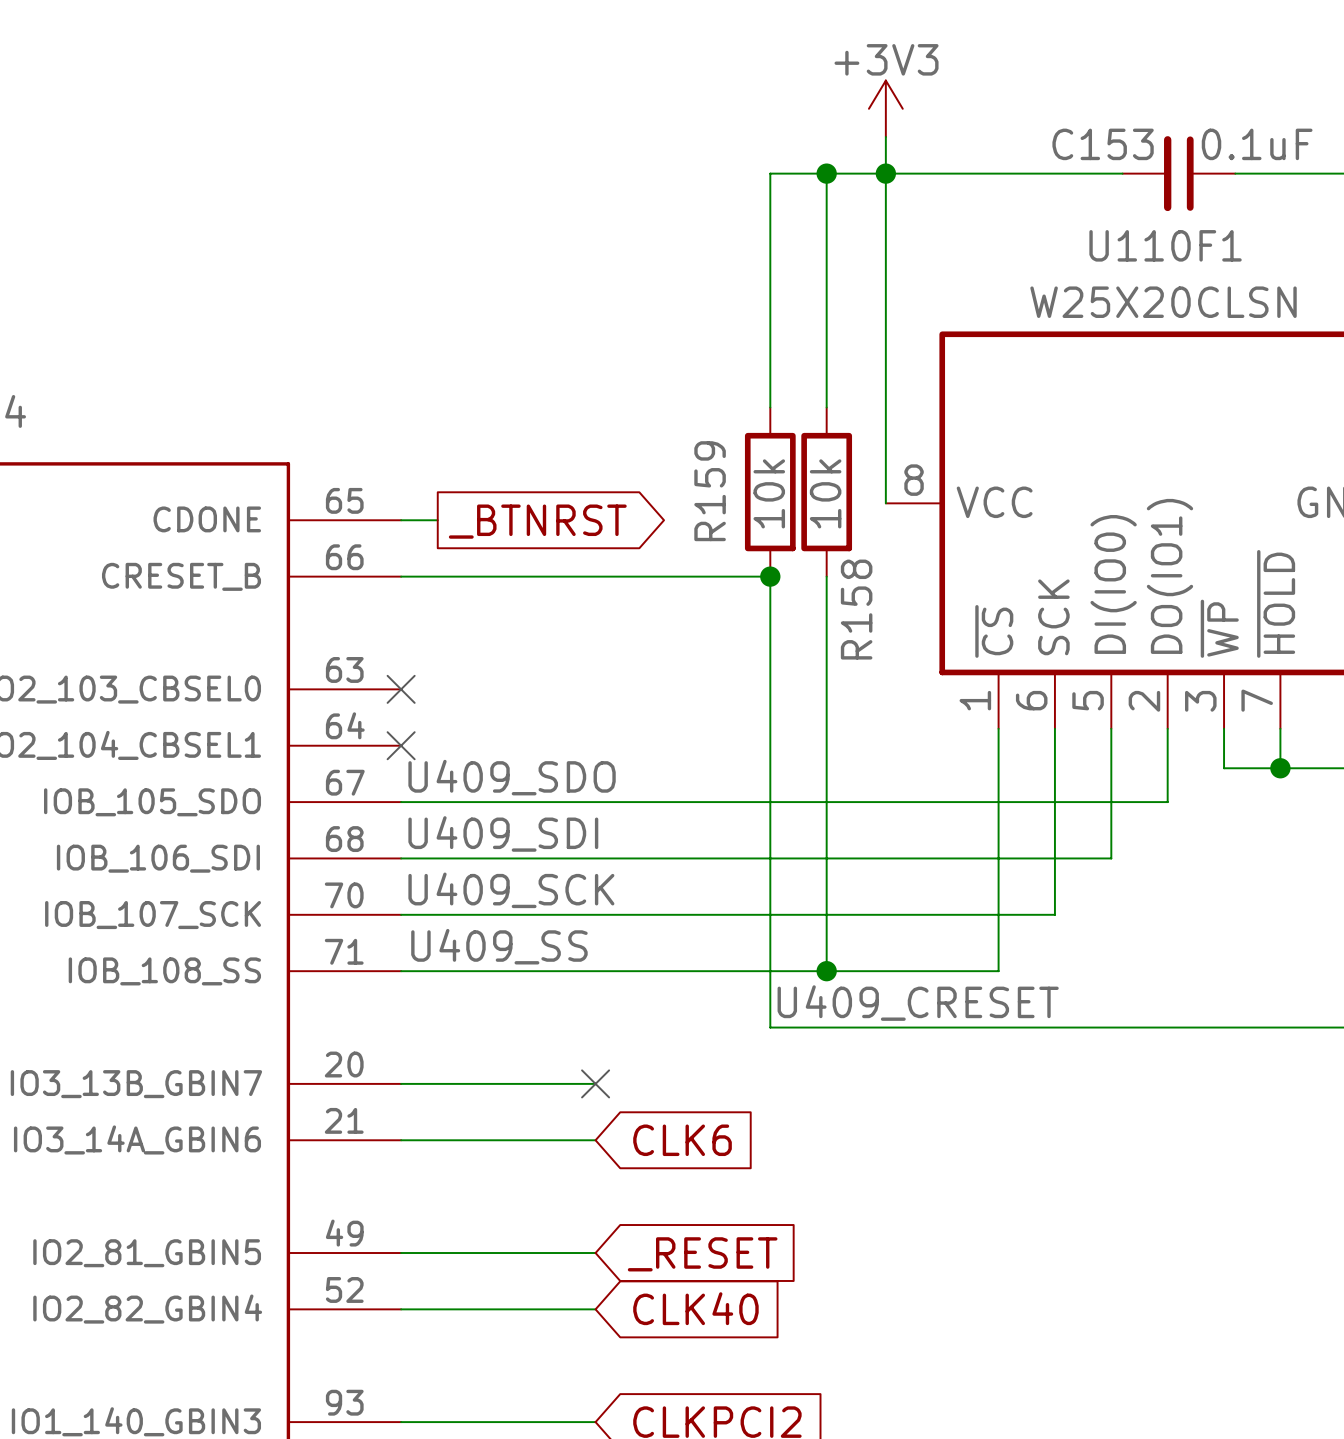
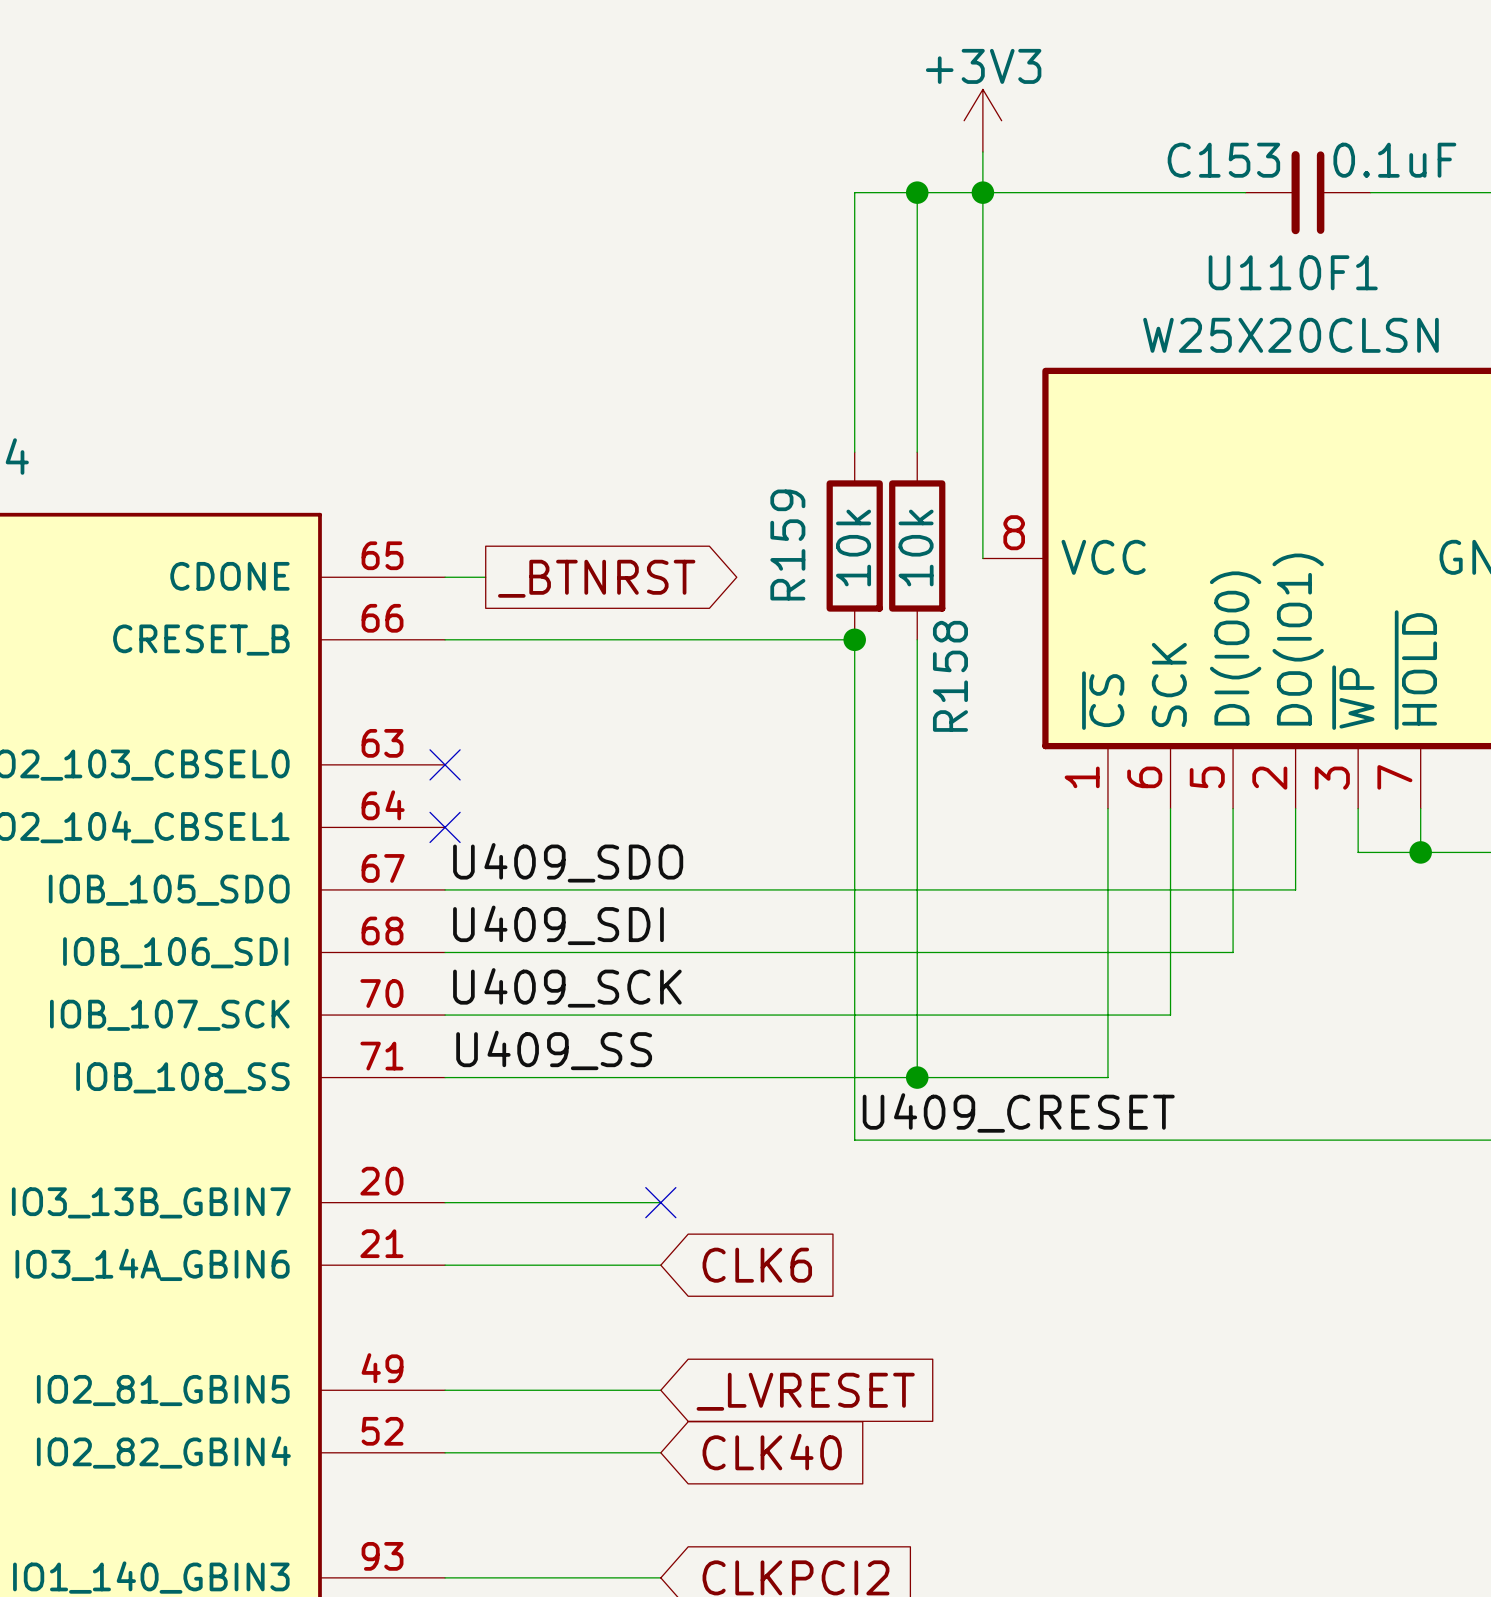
global label: _RESET (702, 1254) -> _LVRESET (805, 1391)

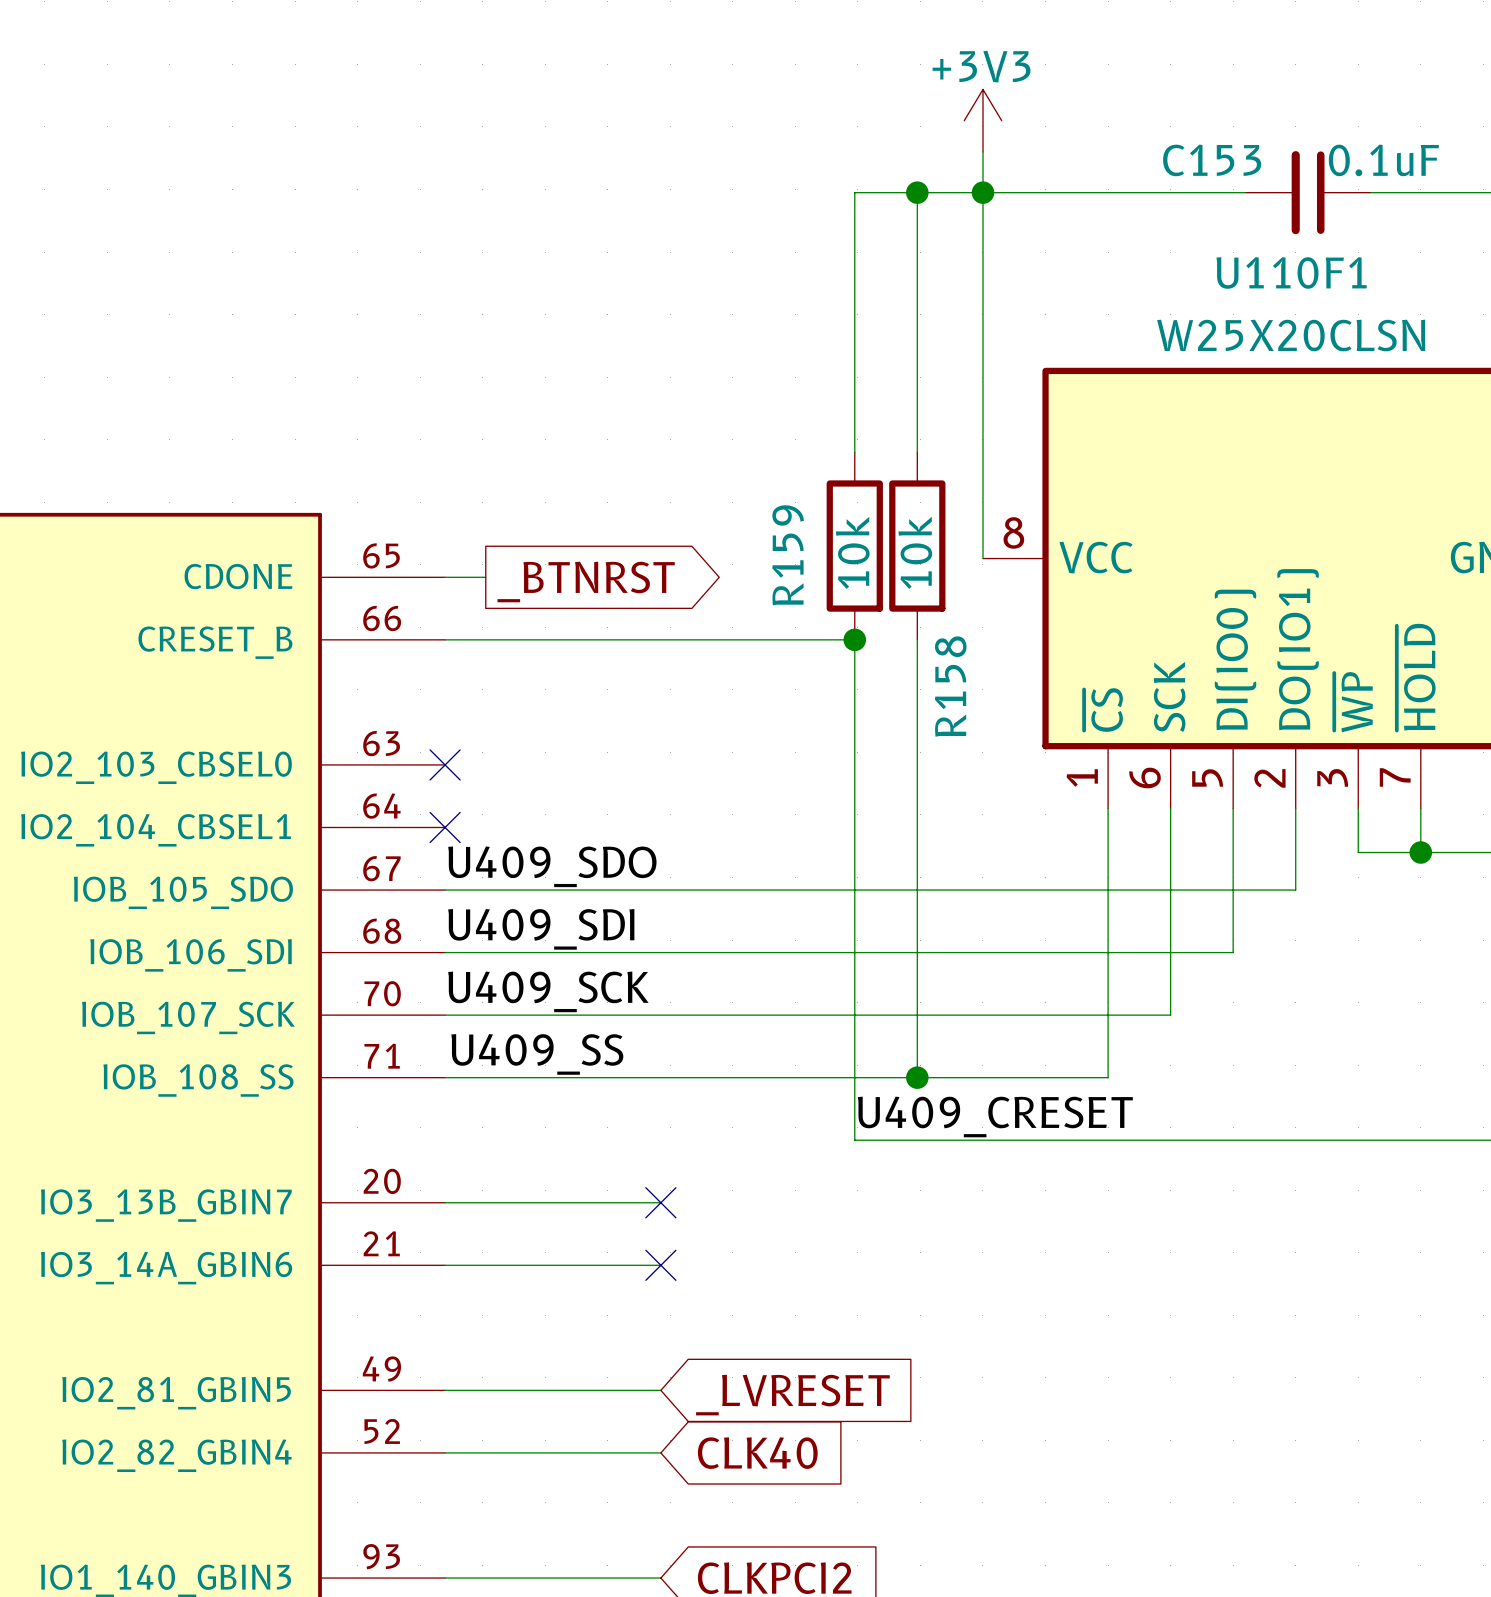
no-connect mark: none -> (660, 1265)
global label: CLK6 (757, 1265) -> none

